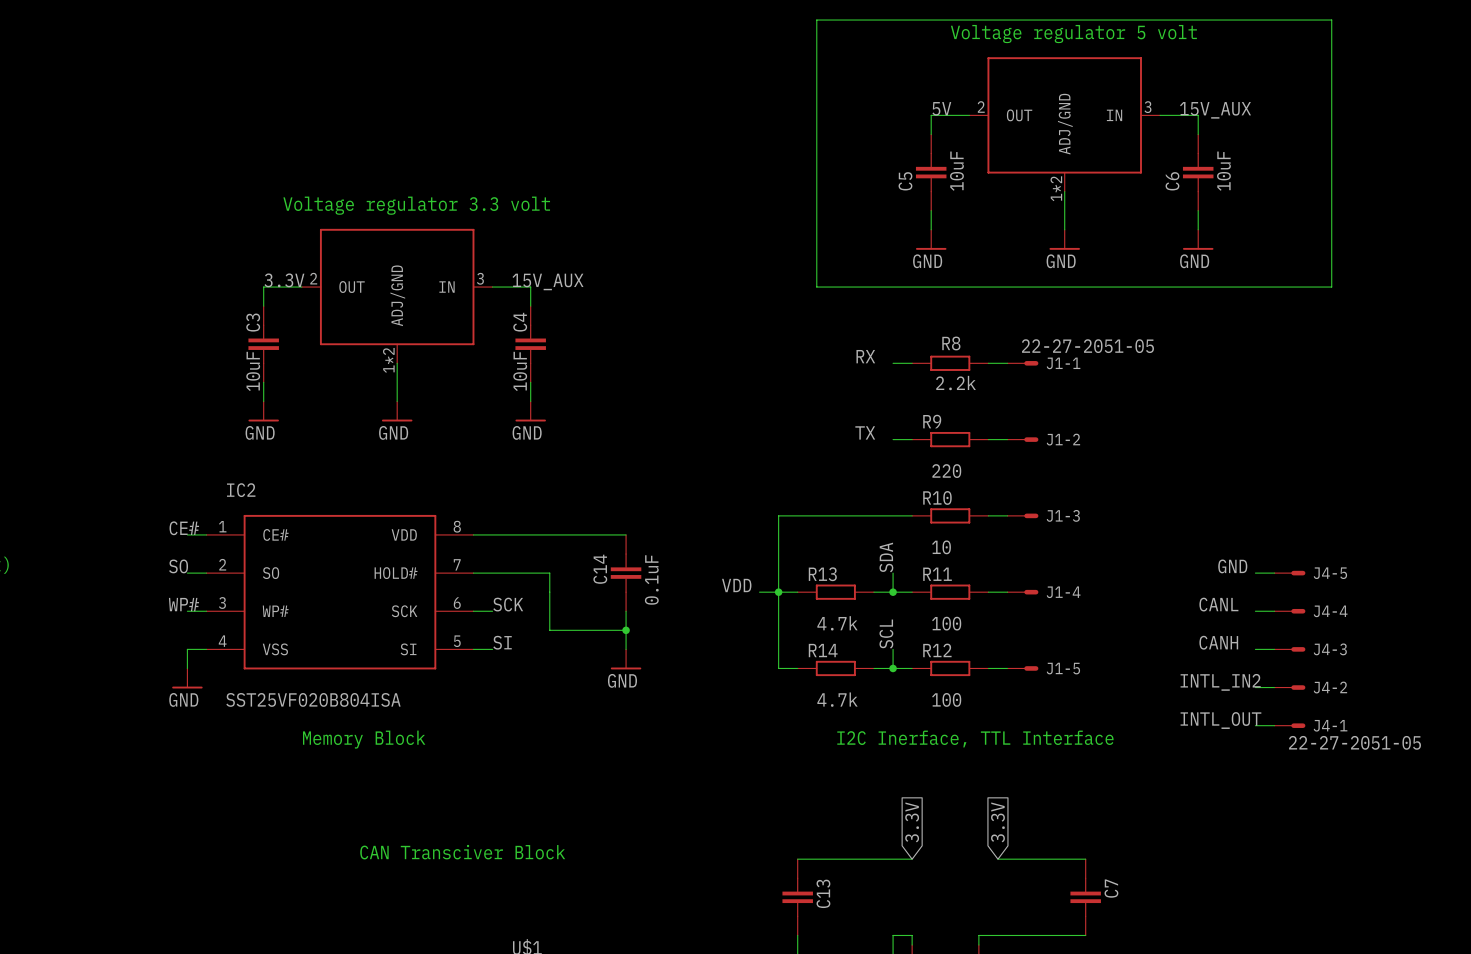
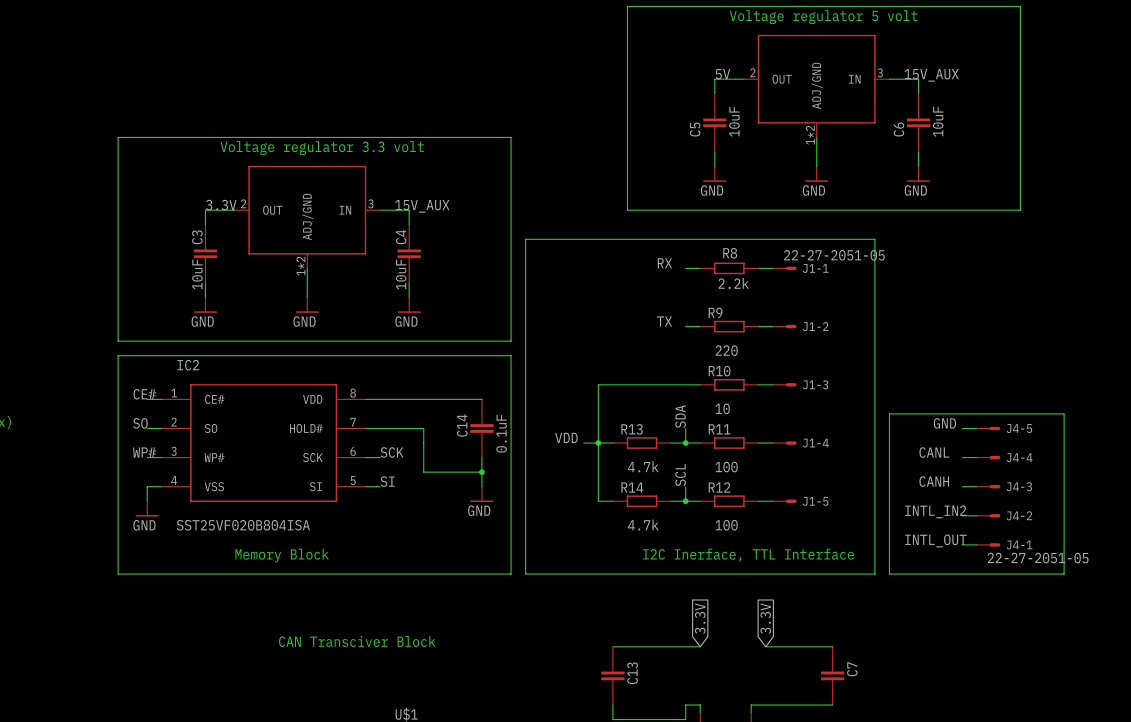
wire: none -> (118, 137) (118, 341) (511, 341) (511, 137) (118, 137)
wire: none -> (525, 239) (874, 239) (874, 574) (525, 574) (525, 239)
wire: none -> (118, 355) (118, 574) (511, 574) (511, 355) (118, 355)
wire: none -> (889, 413) (889, 574) (1064, 574) (1064, 413) (889, 413)

